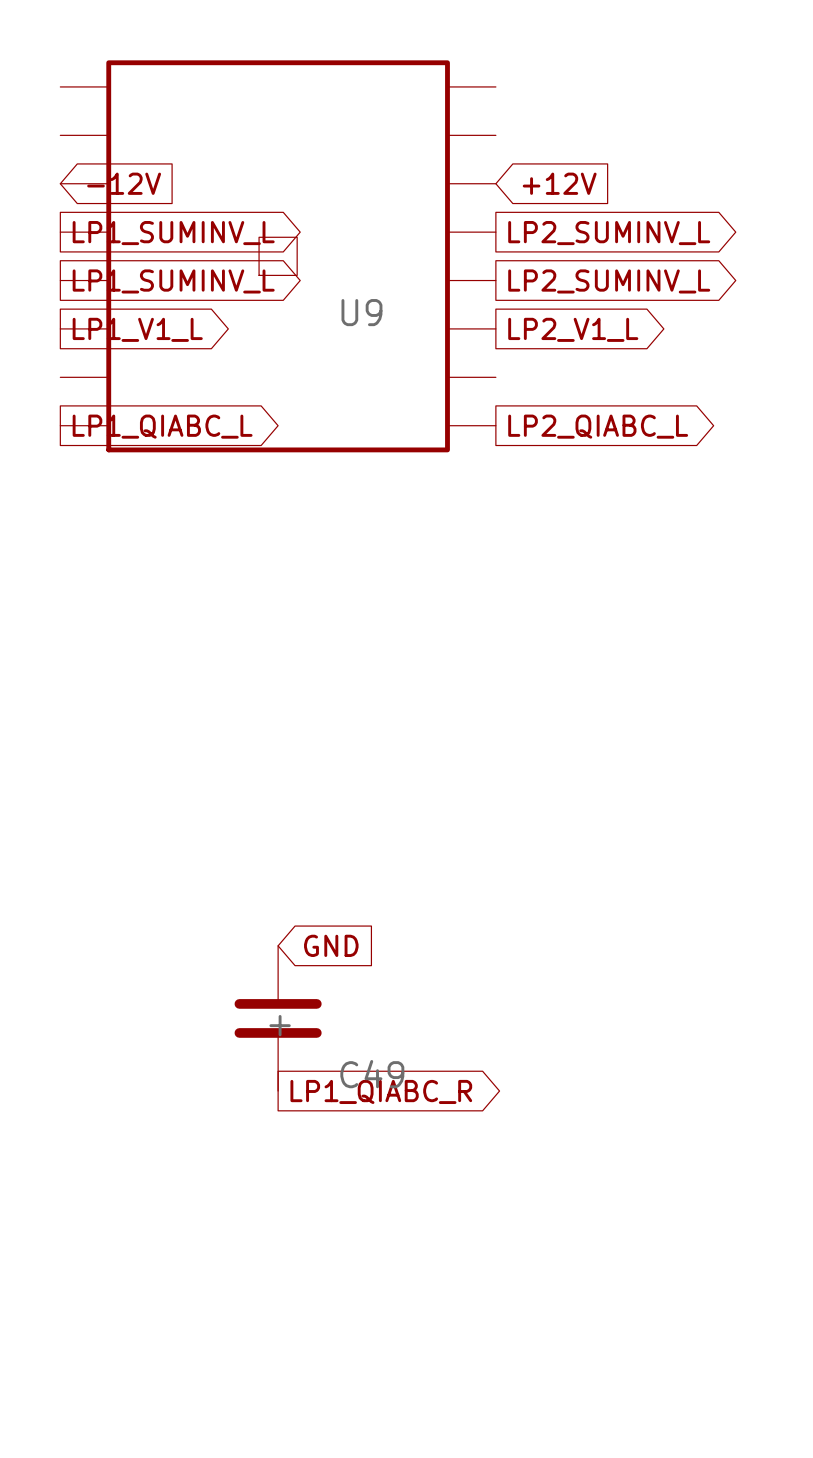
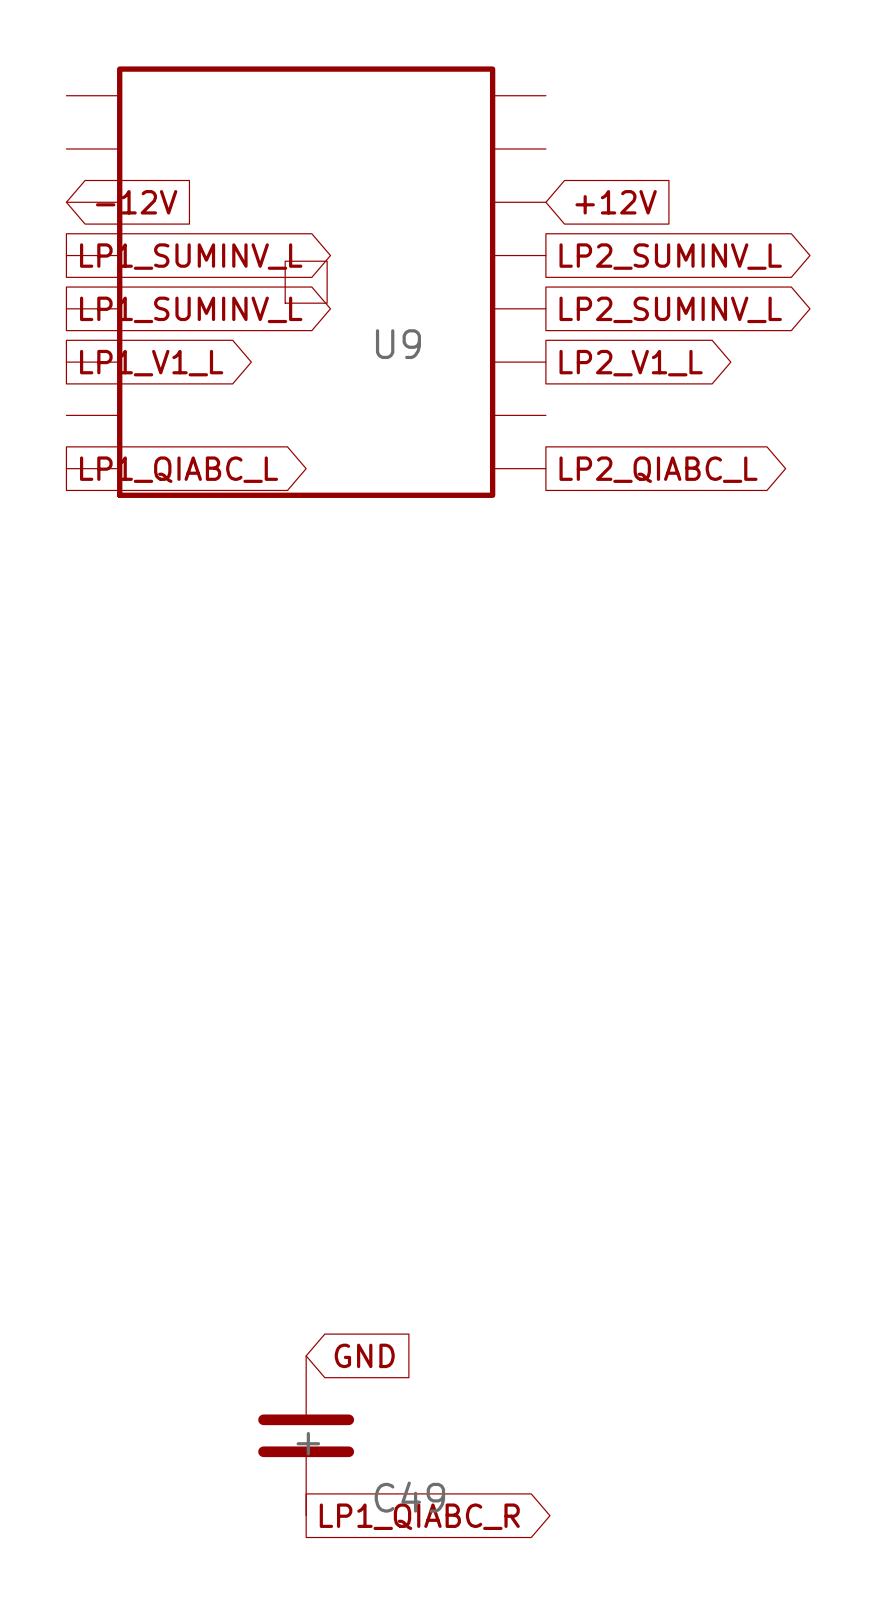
global label position: GND (331, 945) -> GND (364, 1355)
C49 position: (278, 1018) -> (306, 1435)
global label position: LP1_QIABC_R (381, 1091) -> LP1_QIABC_R (419, 1516)

